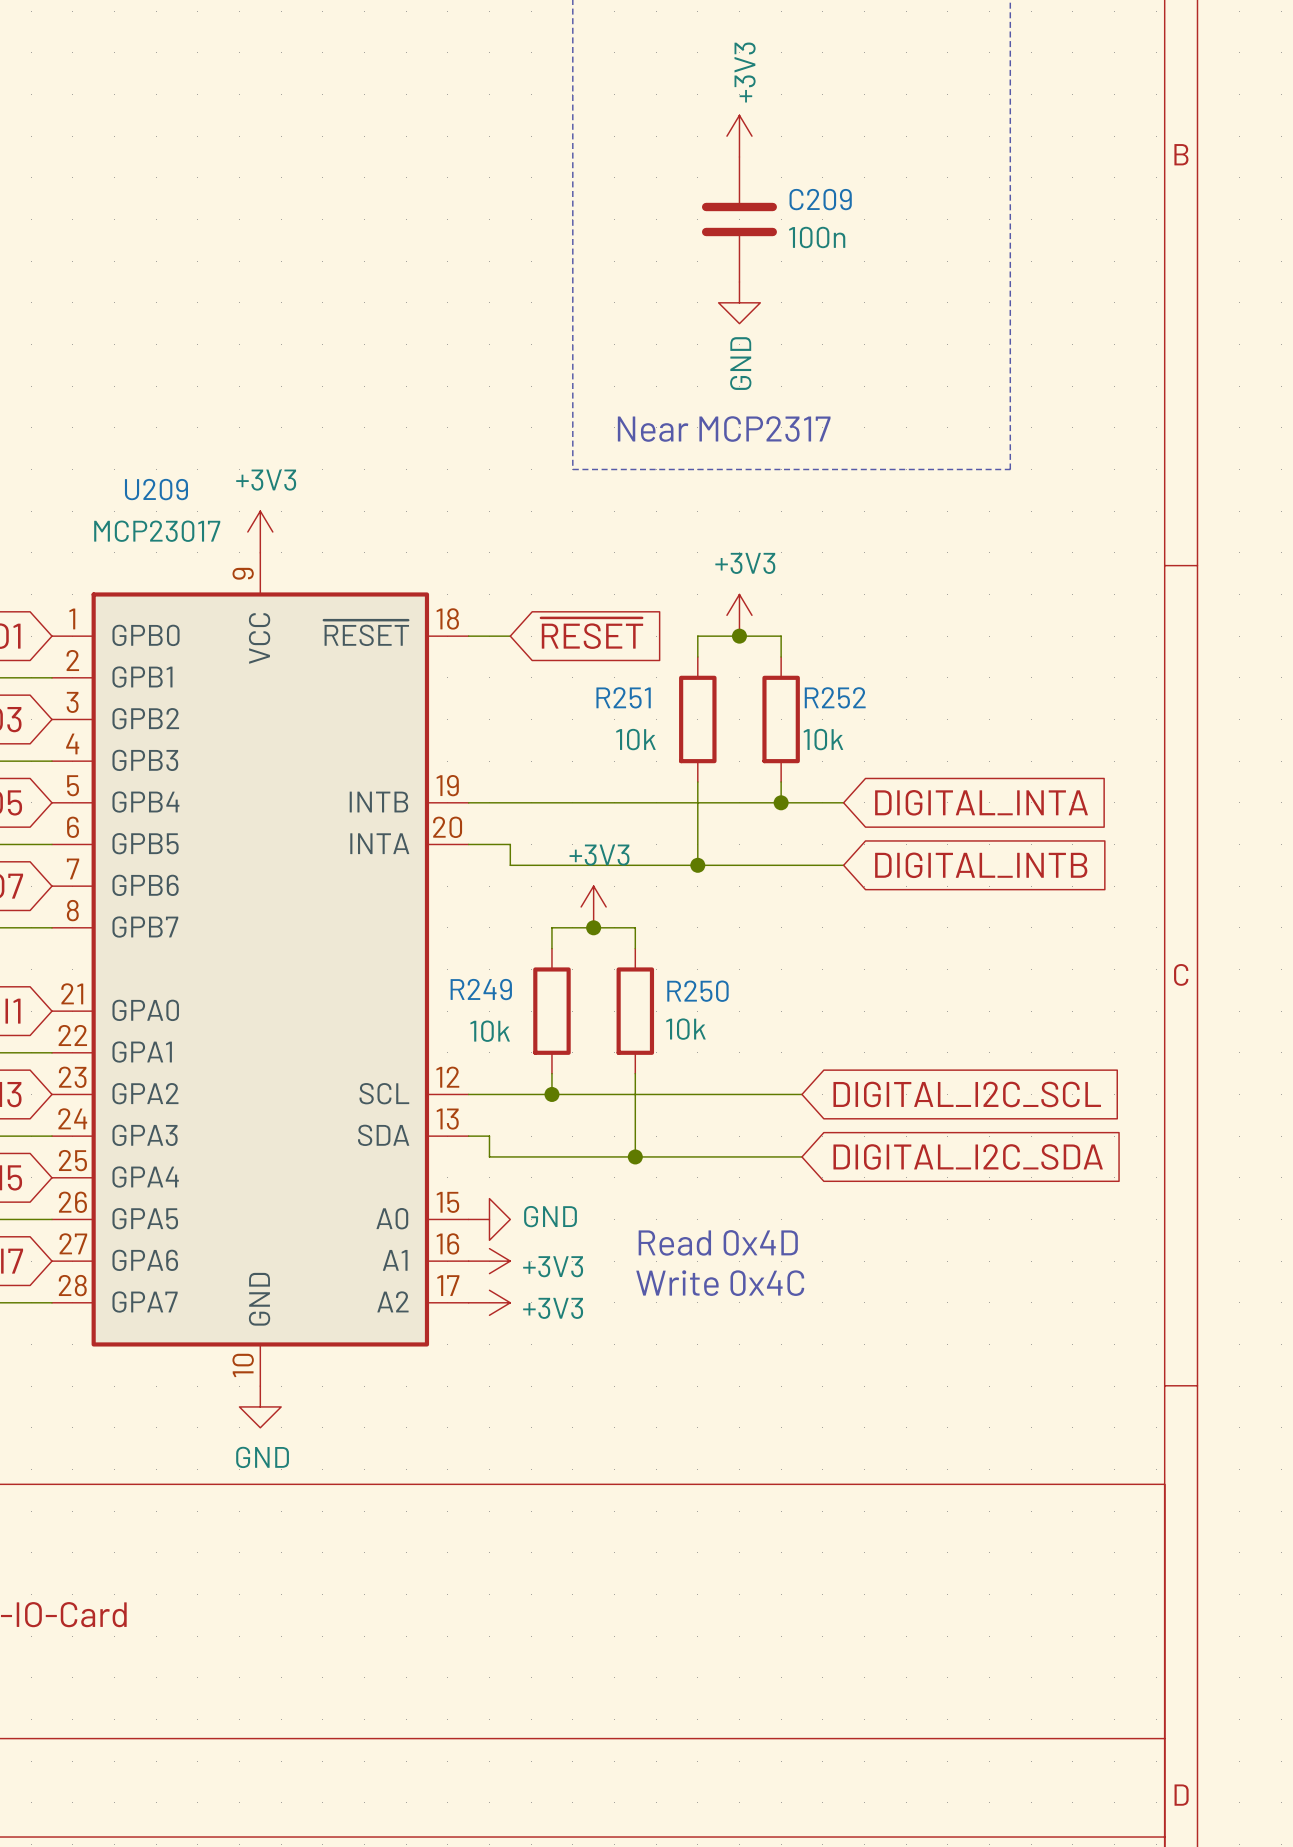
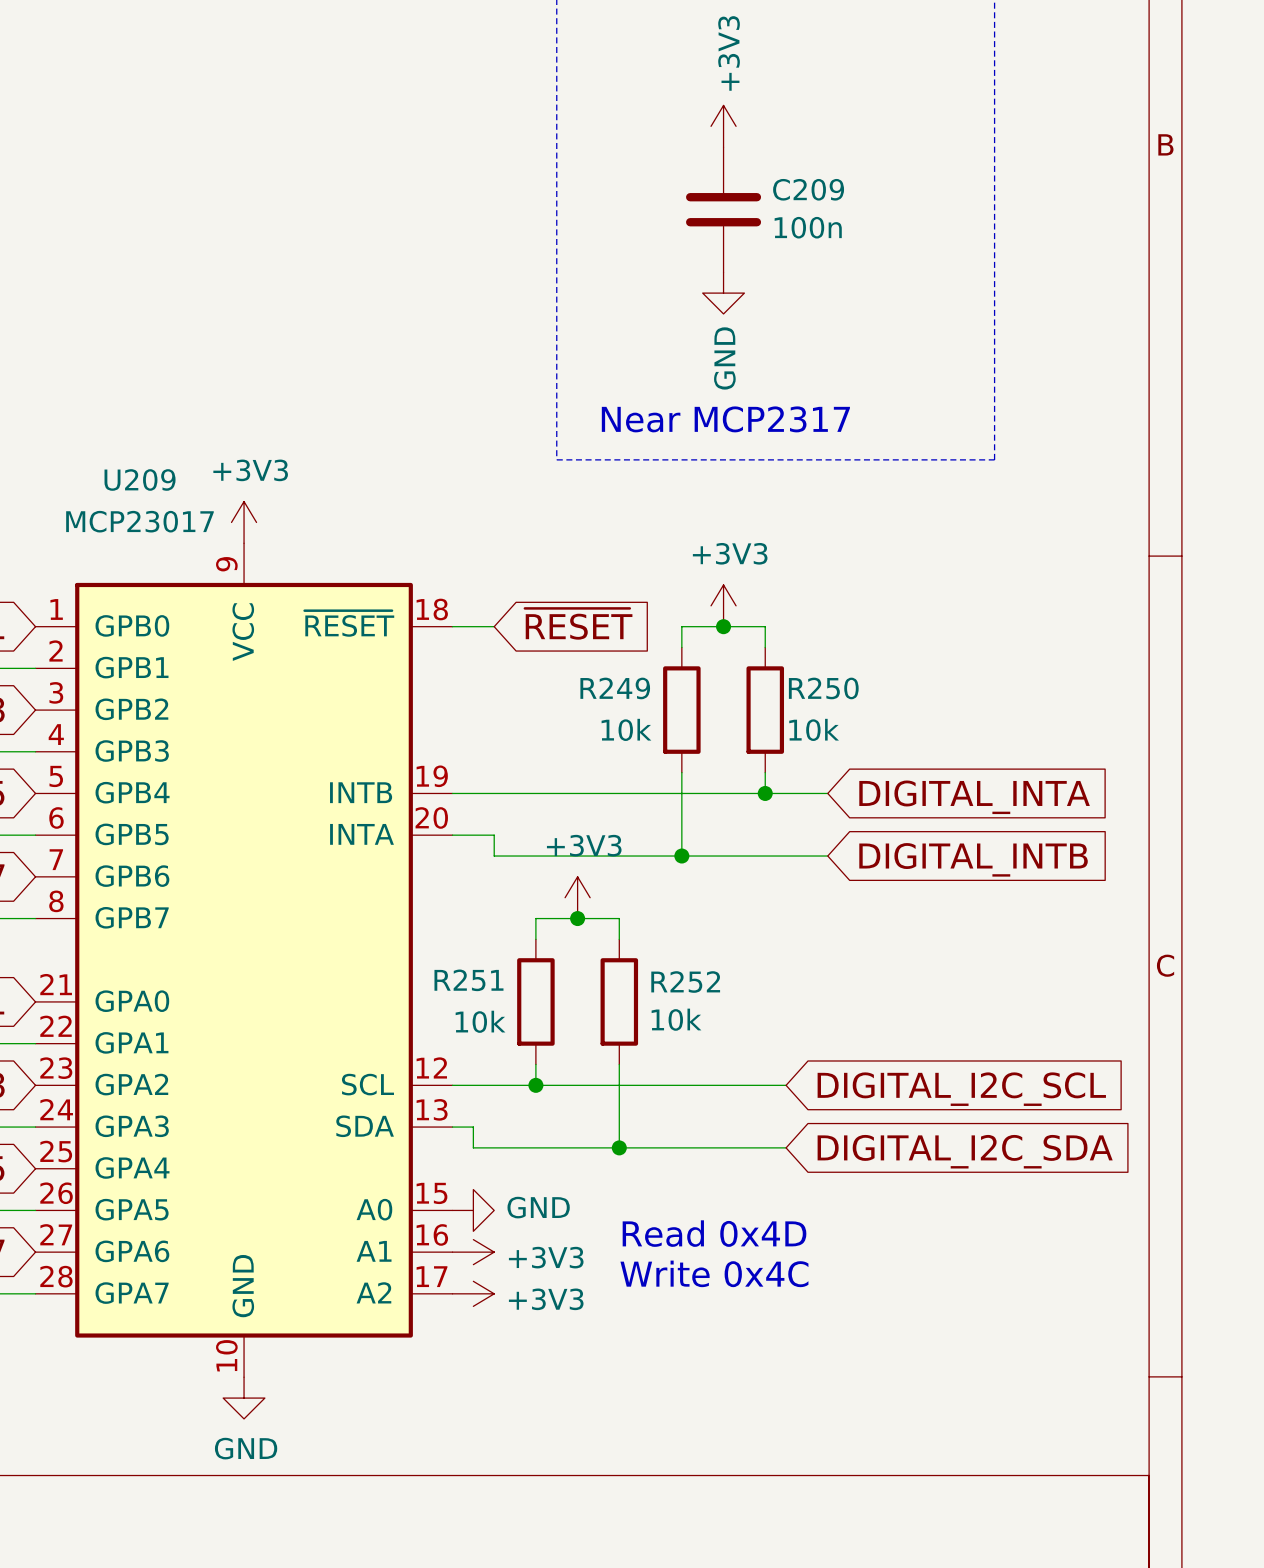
R251 name: R251 (623, 697) -> R249 (615, 688)
R252 name: R252 (835, 697) -> R250 (823, 688)
R249 name: R249 (481, 989) -> R251 (468, 980)
R250 name: R250 (697, 991) -> R252 (685, 982)

